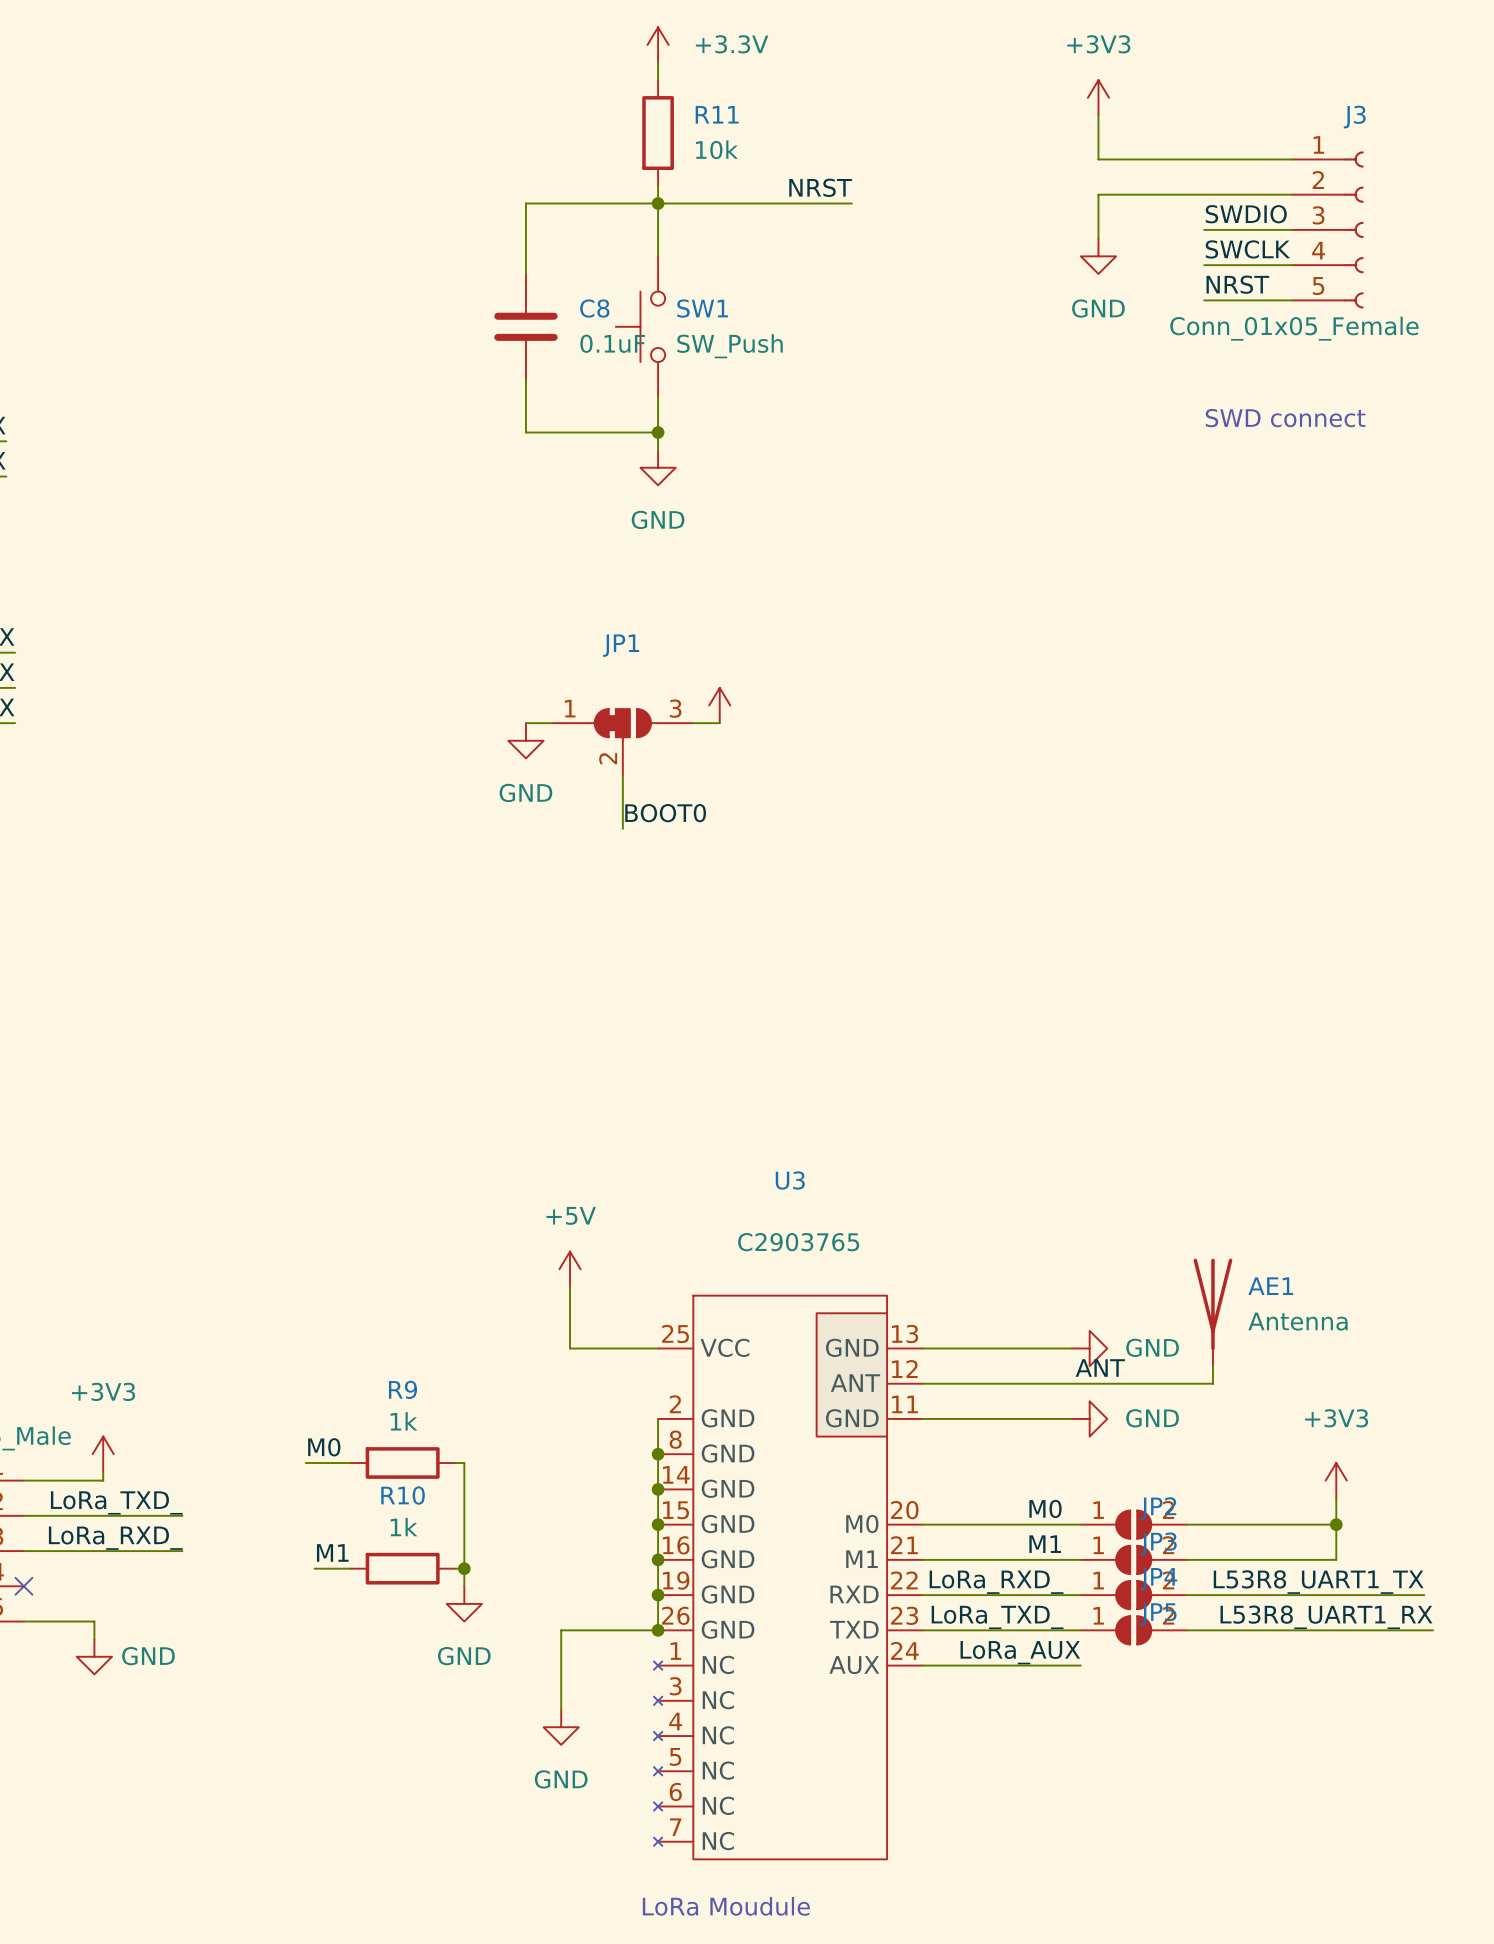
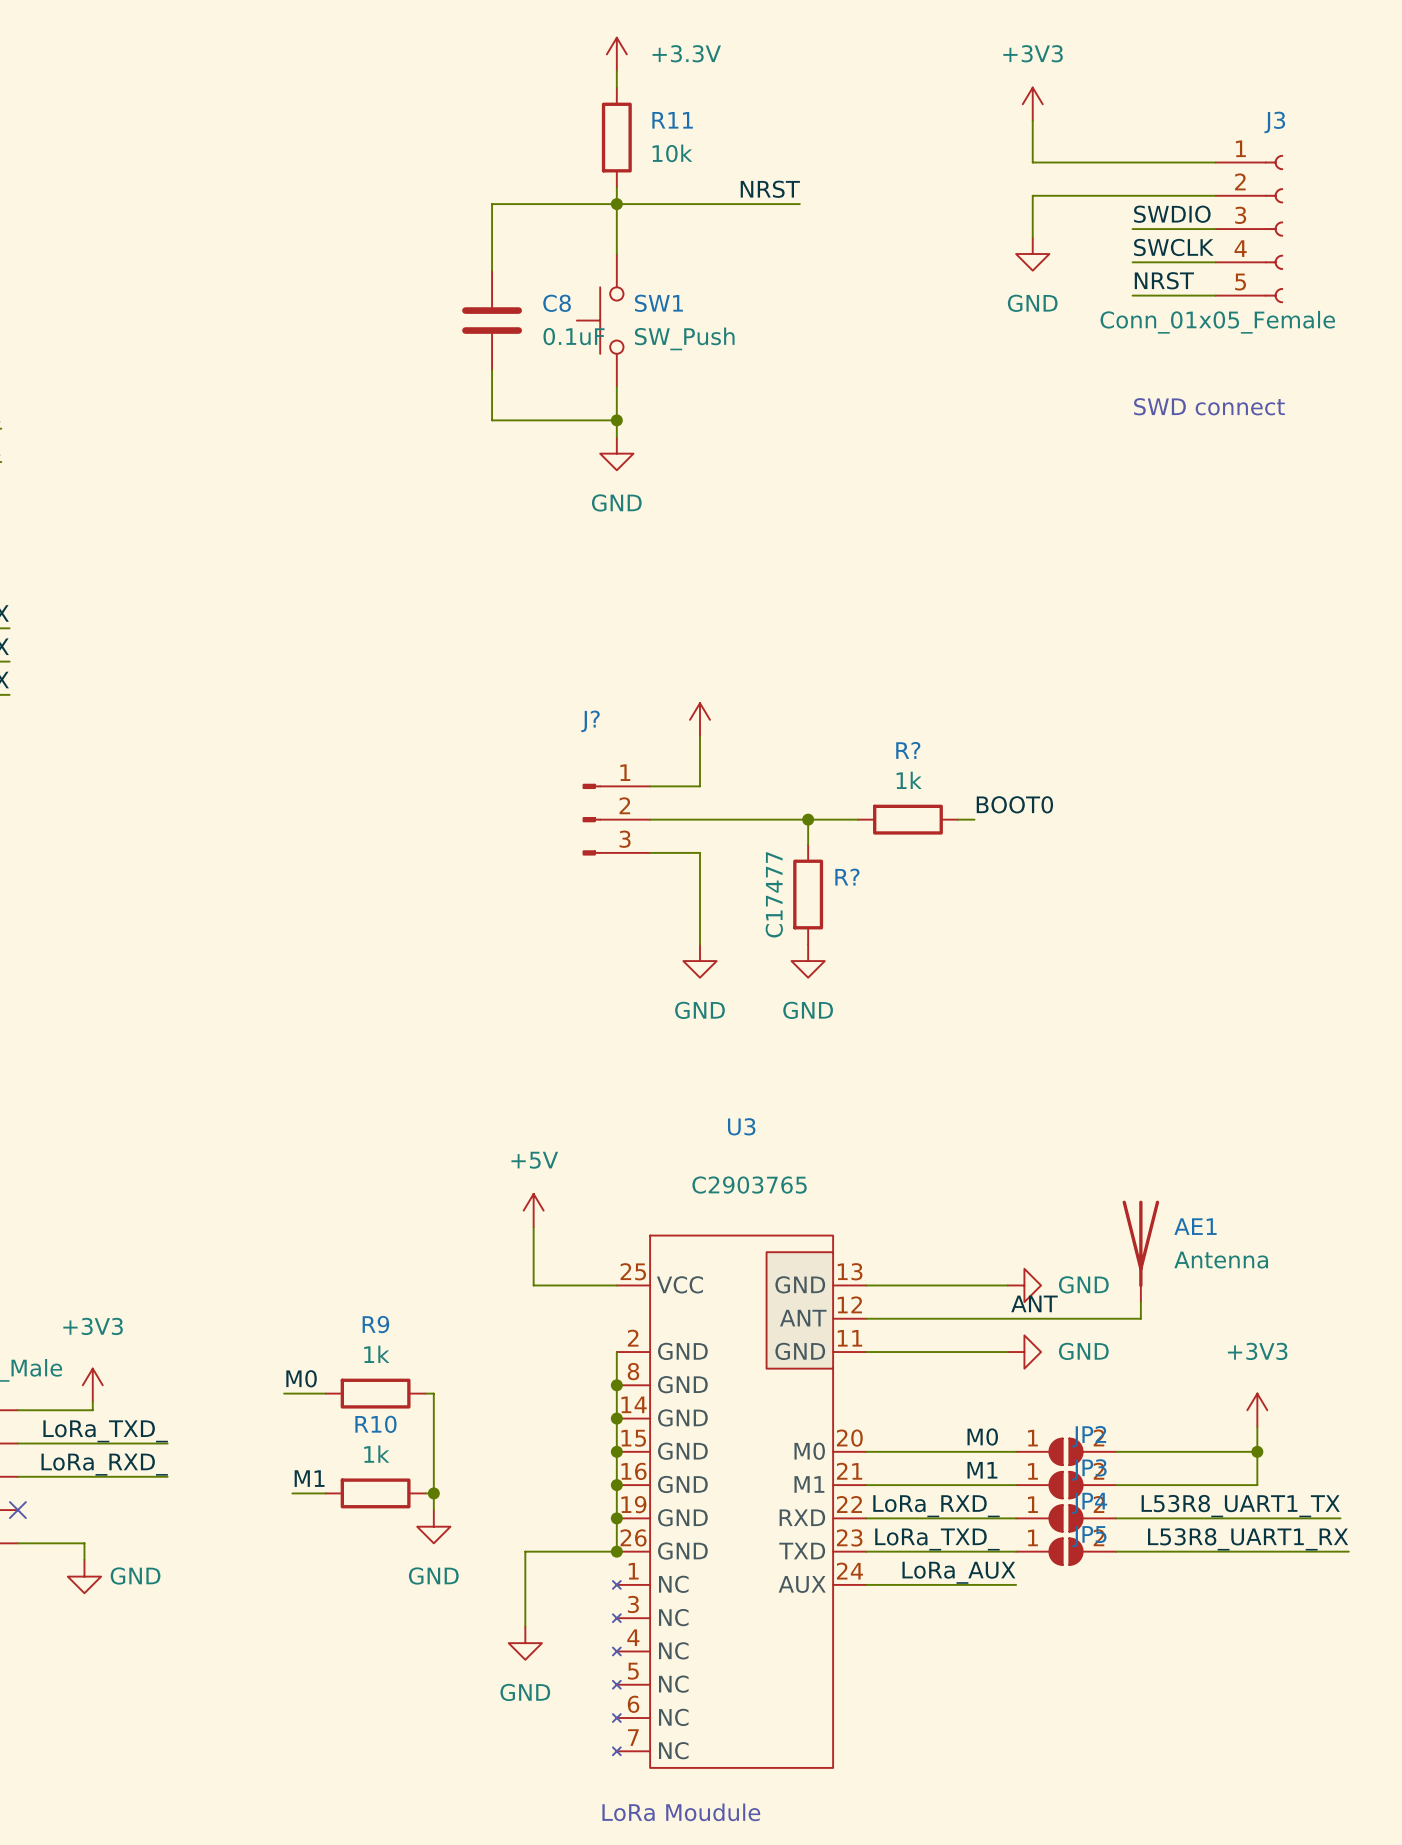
power symbol position: (719, 705) -> (700, 719)
wire: (525, 723) (552, 723) -> none
wire: (693, 723) (719, 723) -> none
power symbol: GND (525, 740) -> none
JP1: (622, 742) -> none
wire: none -> (700, 736) (700, 786) (650, 786)
wire: (622, 776) (622, 828) -> none
label: BOOT0 (665, 813) -> none
label: none -> BOOT0 (1014, 804)
J?: none -> (616, 819)
wire: none -> (650, 819) (858, 819)
wire: none -> (808, 819) (808, 844)
junction: none -> (808, 819)
R?: none -> 1k (907, 819)
wire: none -> (957, 819) (974, 819)
wire: none -> (650, 852) (700, 852) (700, 944)
R?: none -> (808, 894)
power symbol: none -> GND (700, 961)
power symbol: none -> GND (808, 961)

